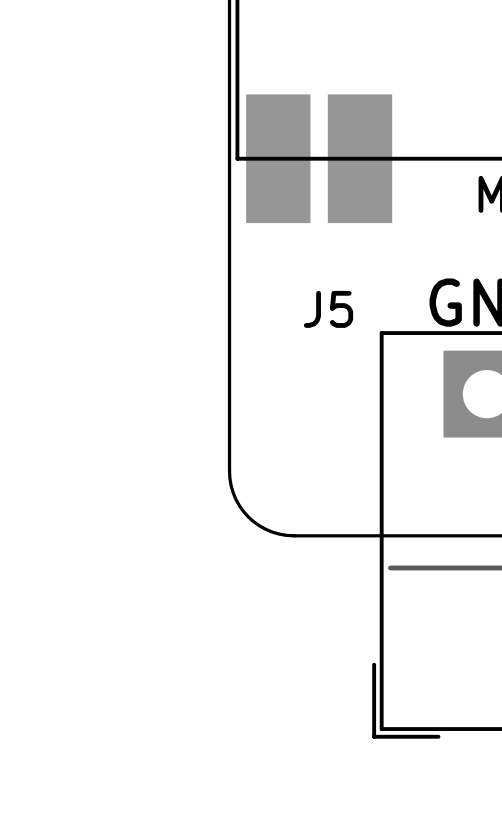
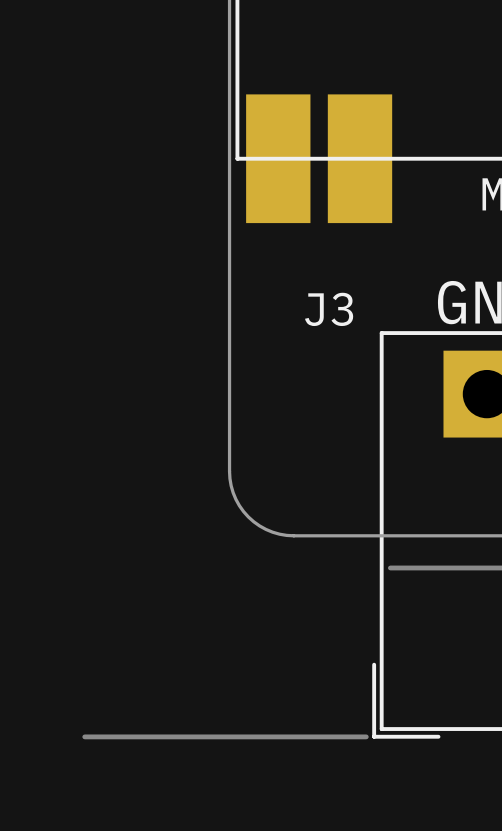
J5 name: J5 (328, 309) -> J3 (329, 309)
line: none -> (84, 736) (366, 736)

